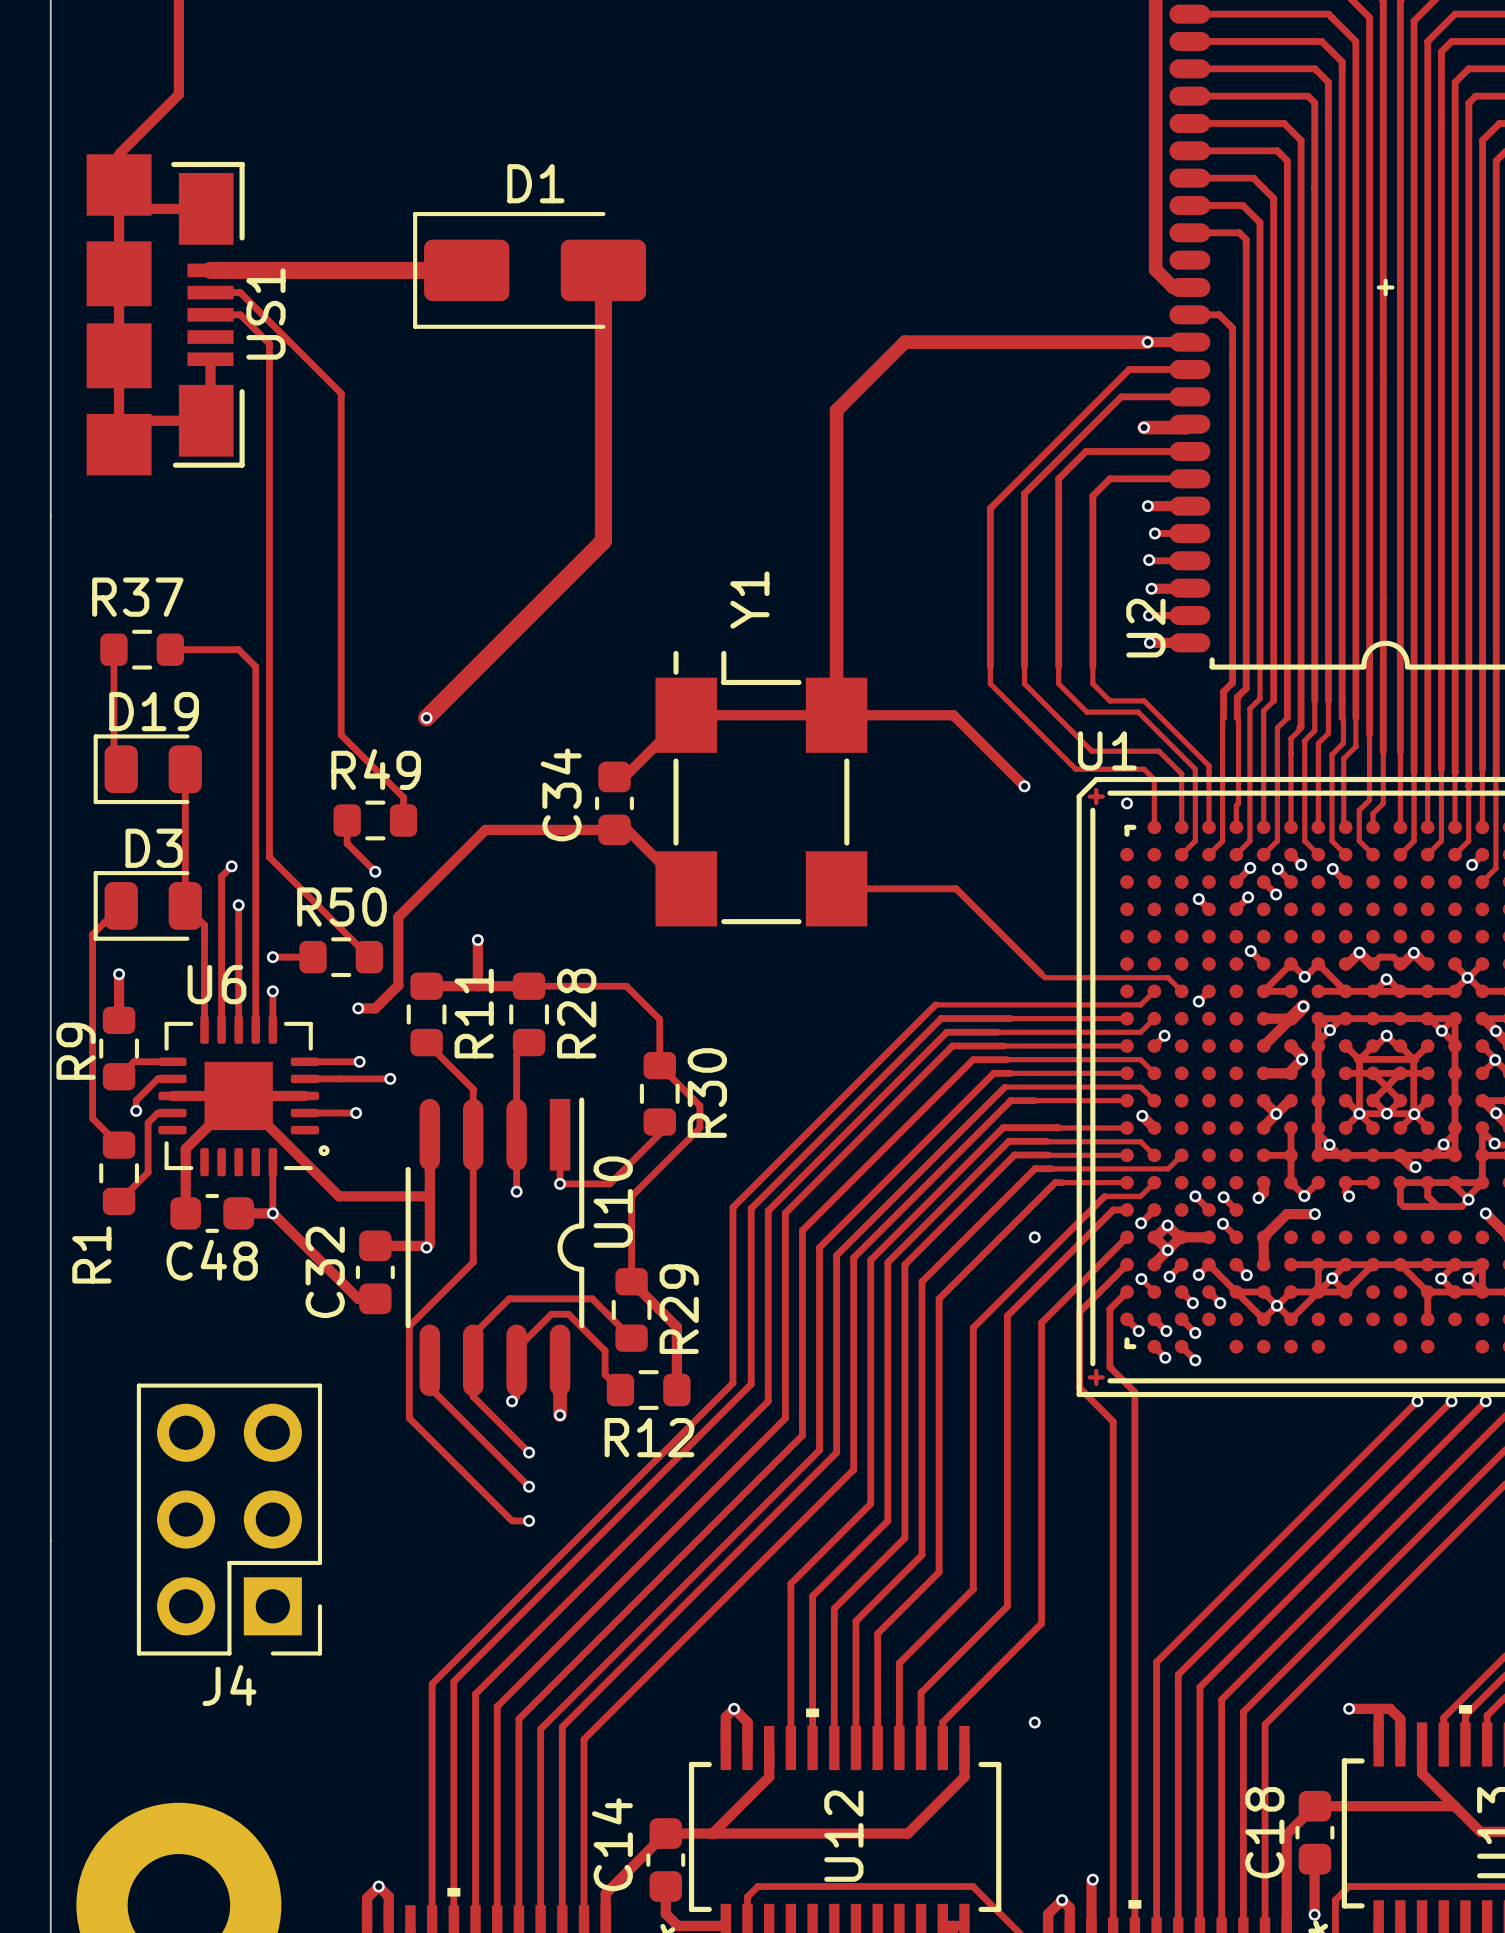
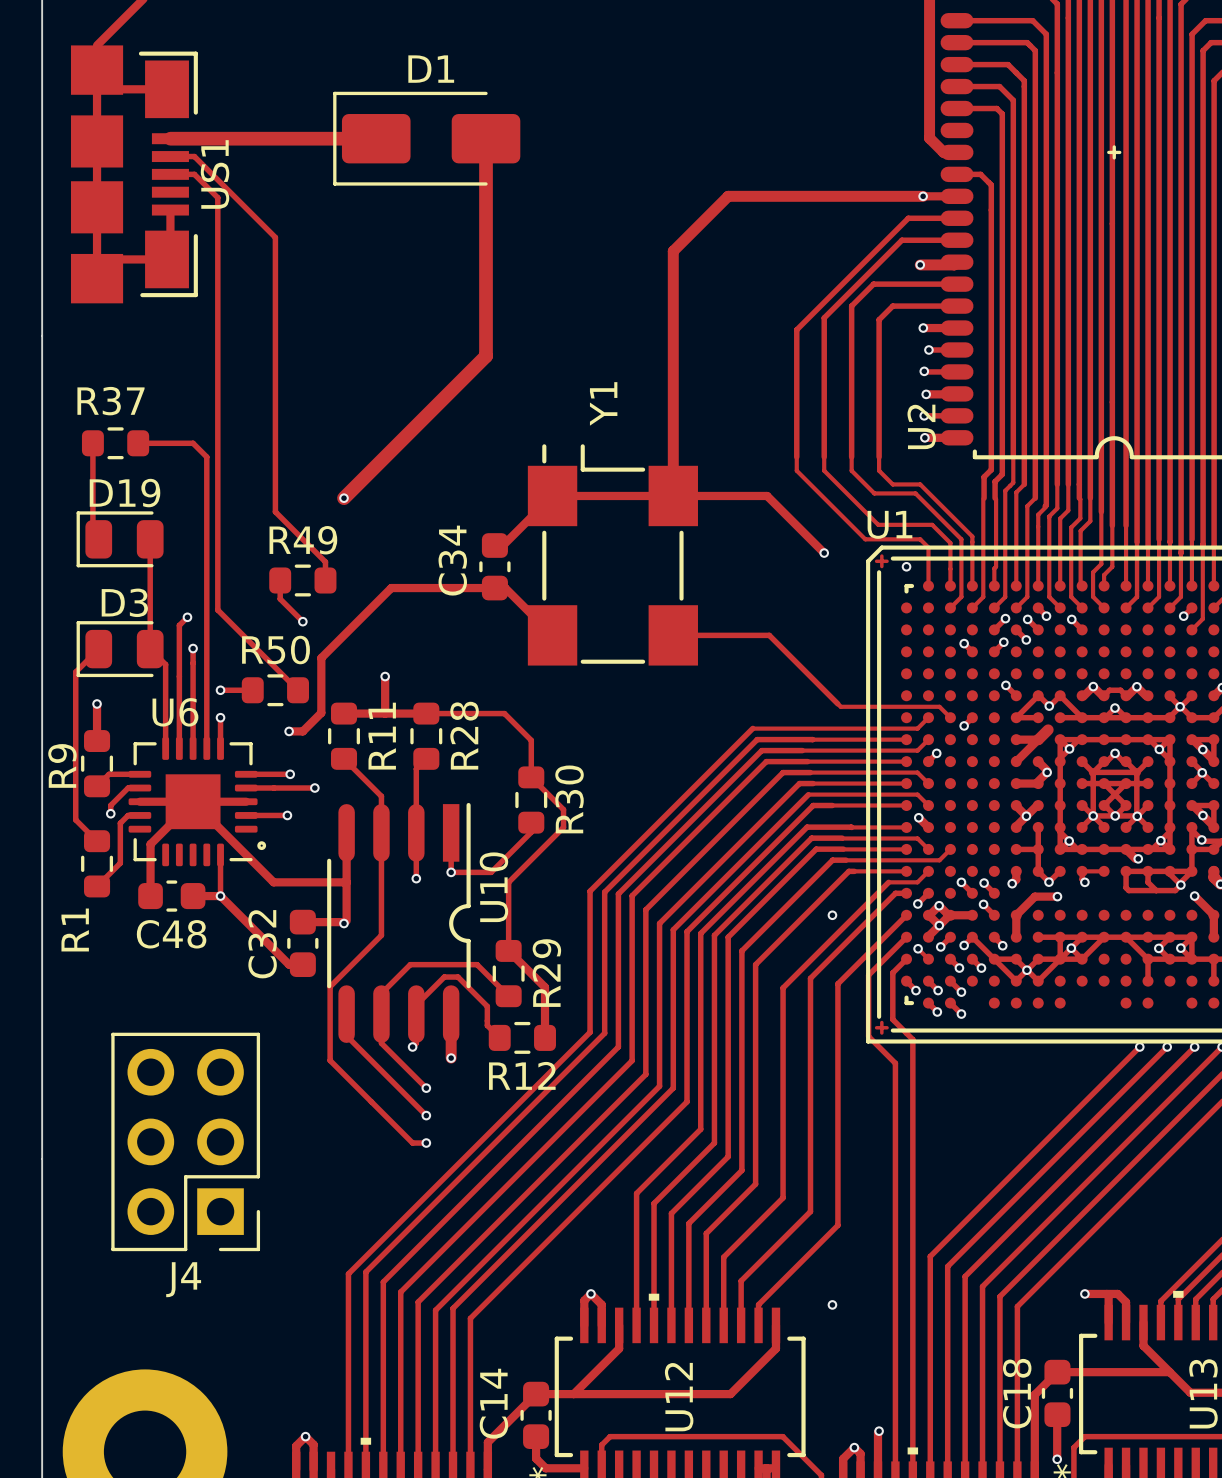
via: (1303, 1006) -> none

